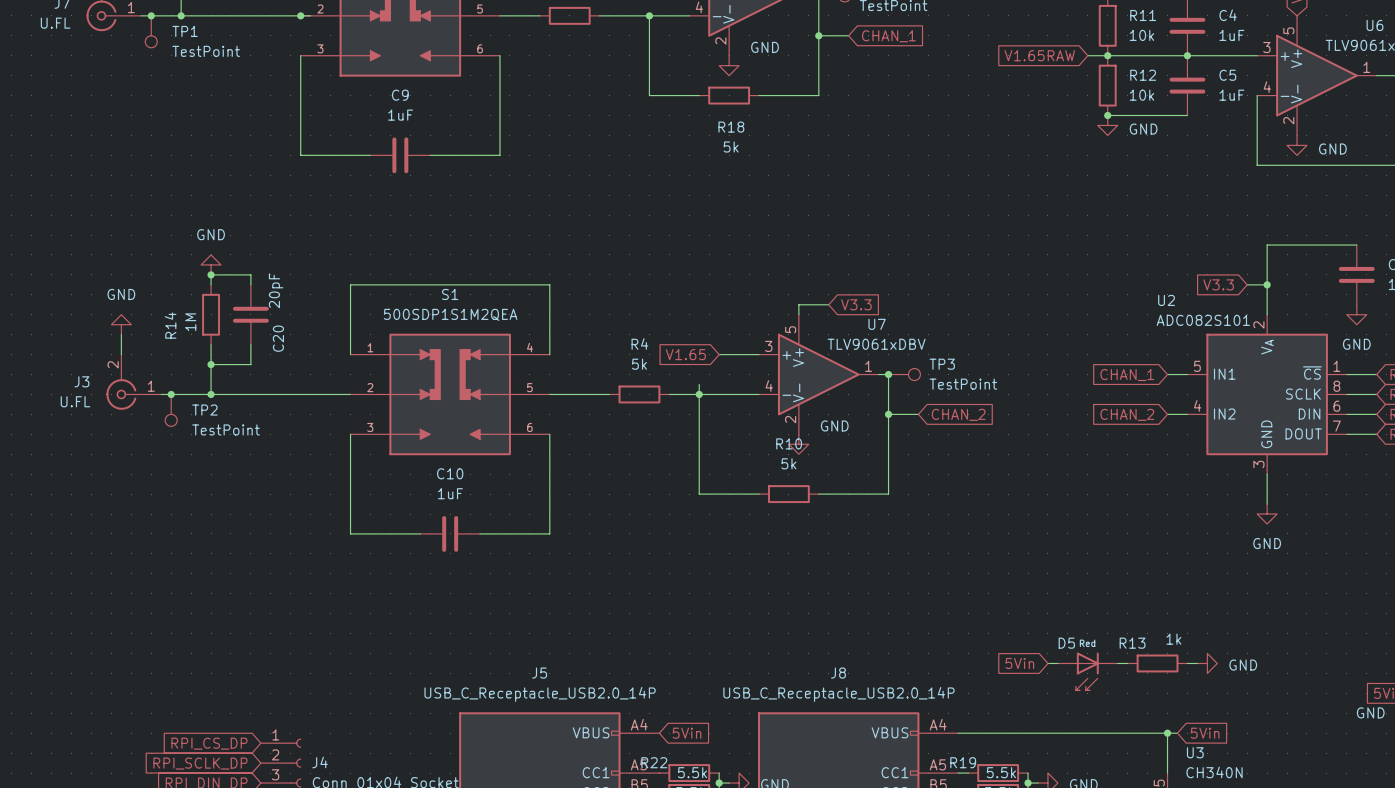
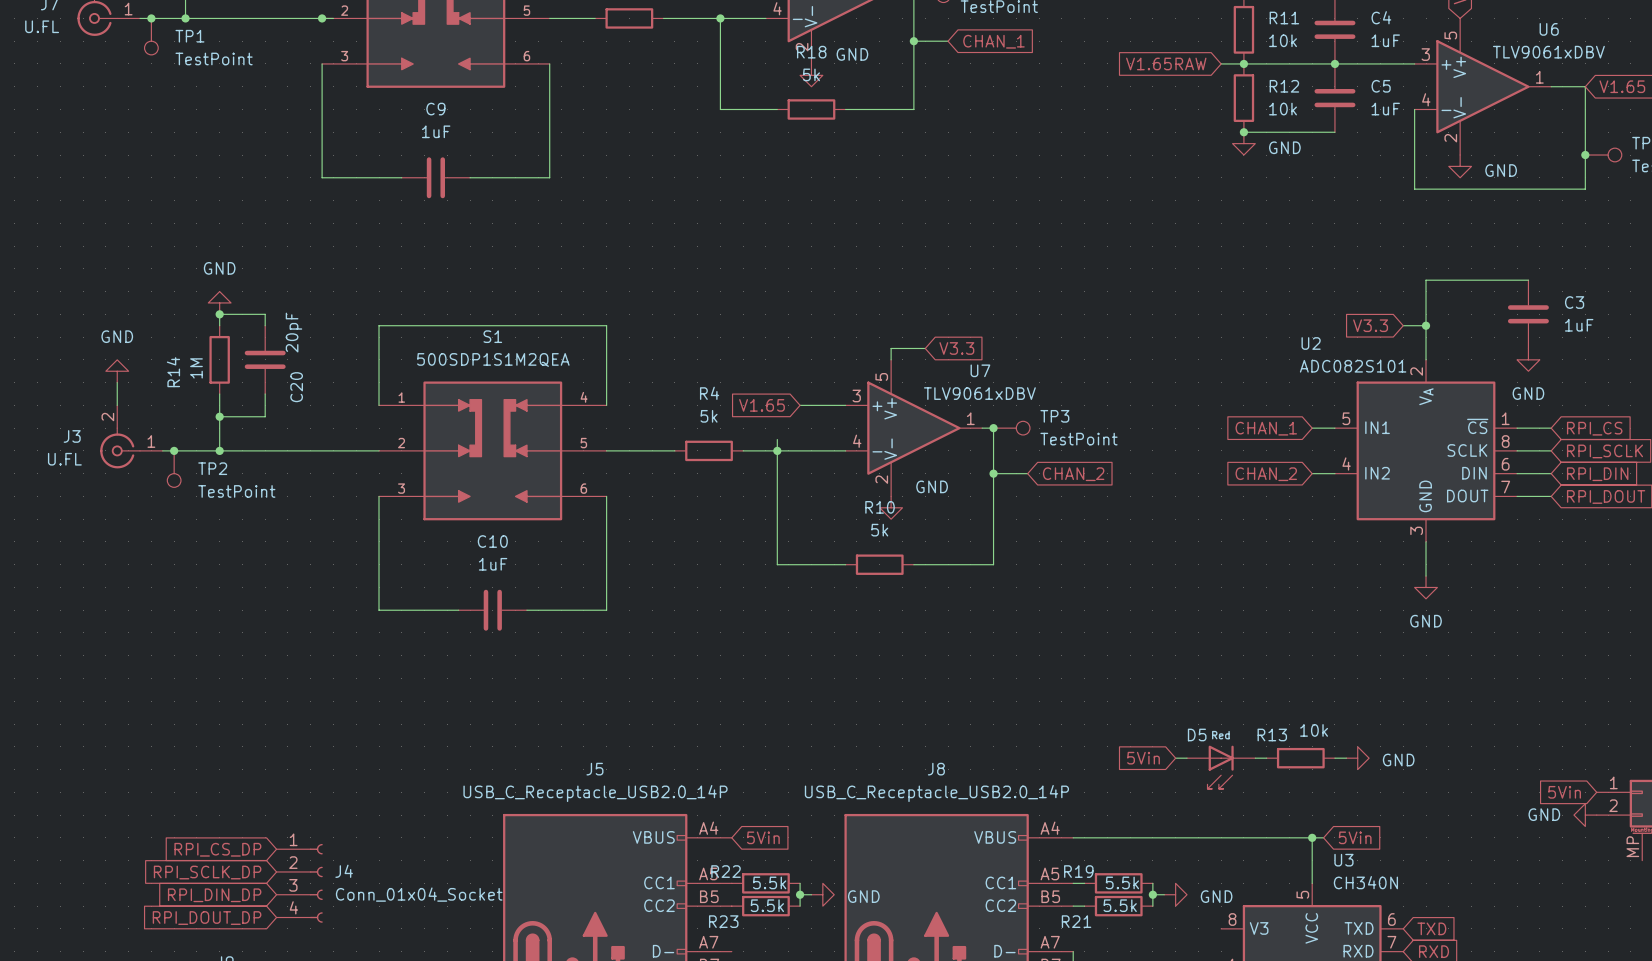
R18 name position: R18 (731, 127) -> R18 (811, 52)
R18 value position: 5k (731, 147) -> 5k (811, 74)
R13 value: 1k (1173, 639) -> 10k (1314, 730)

